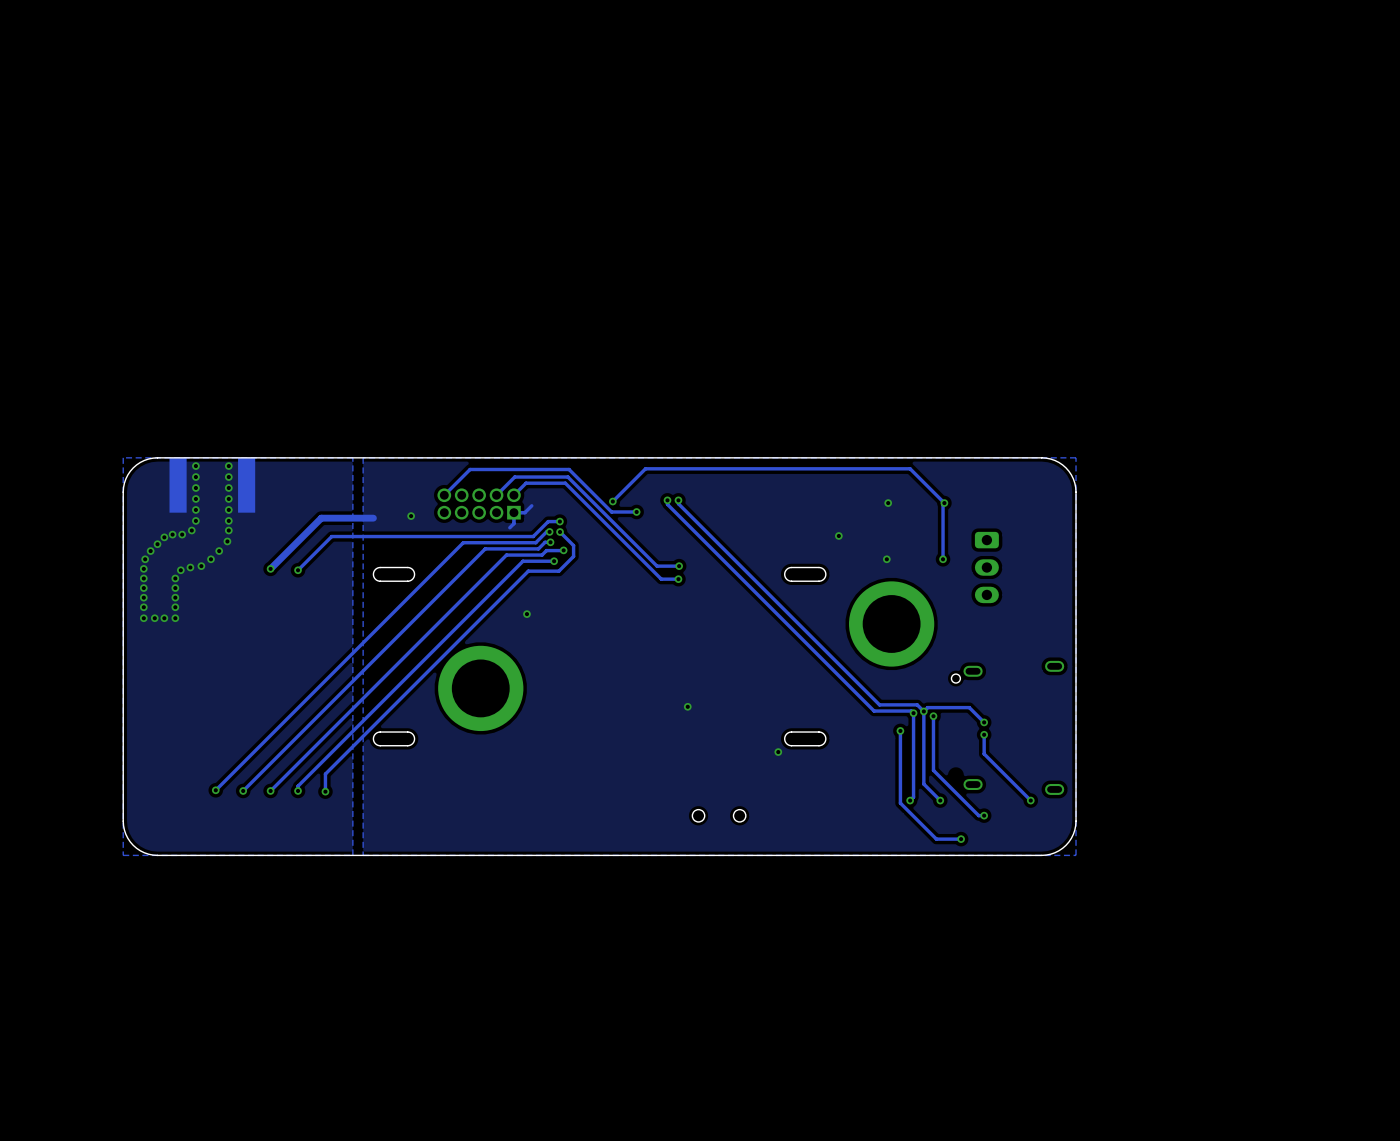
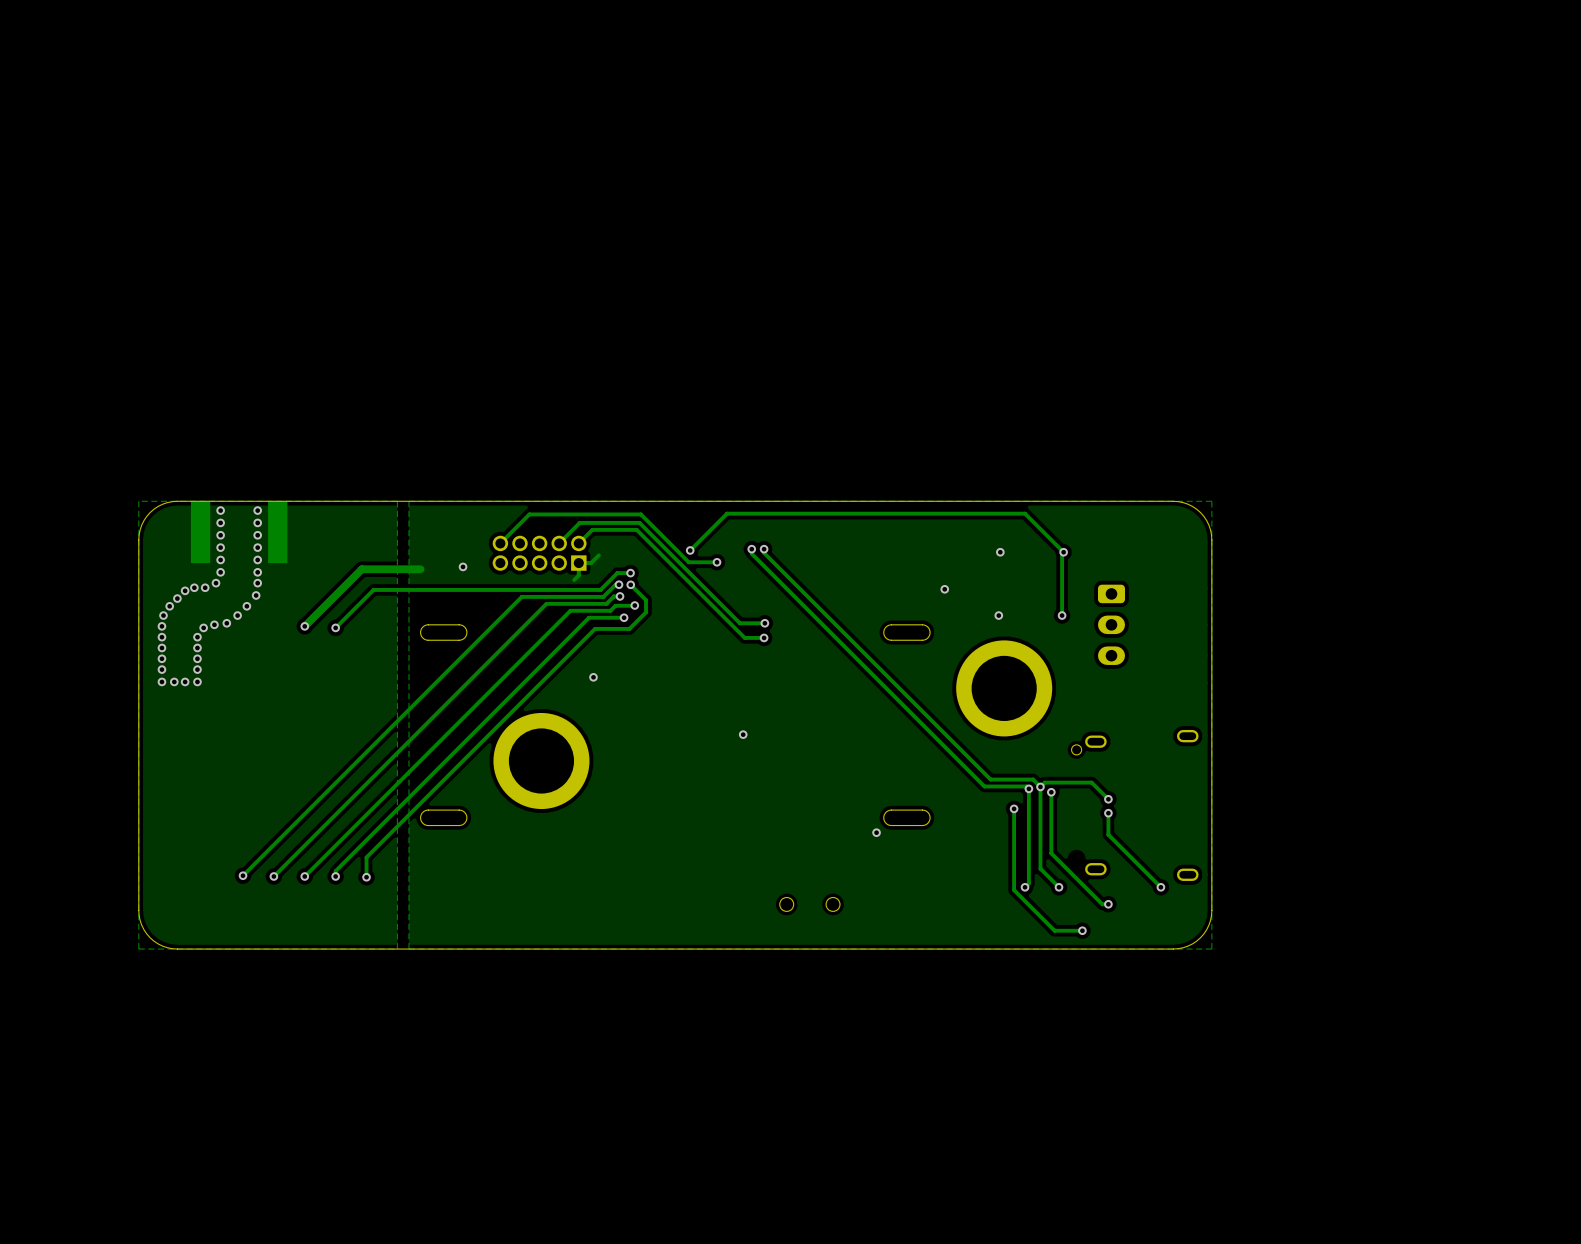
via position: (687, 706) -> (743, 734)

